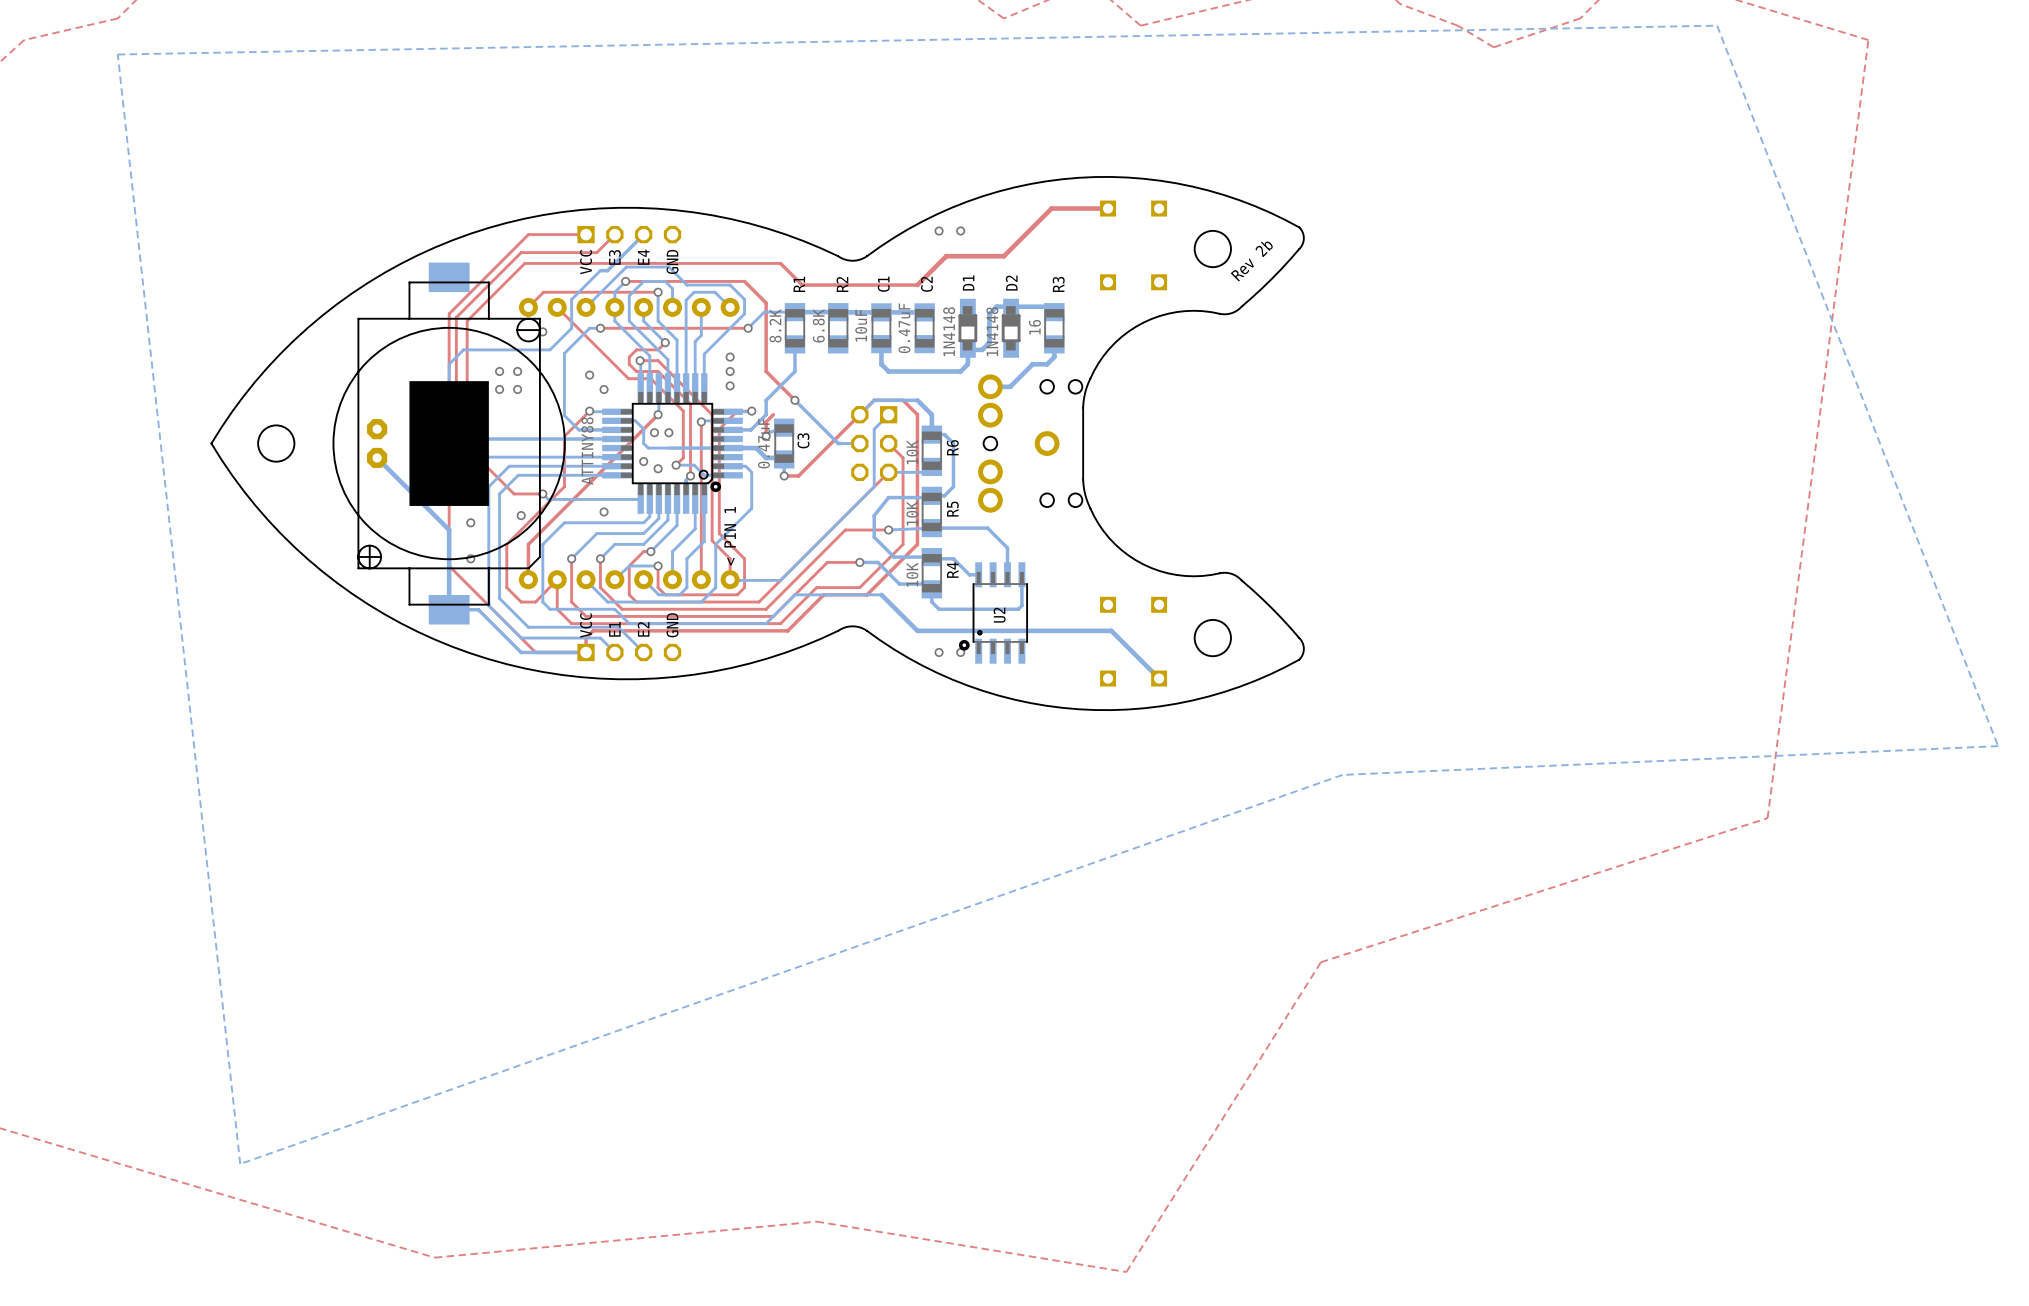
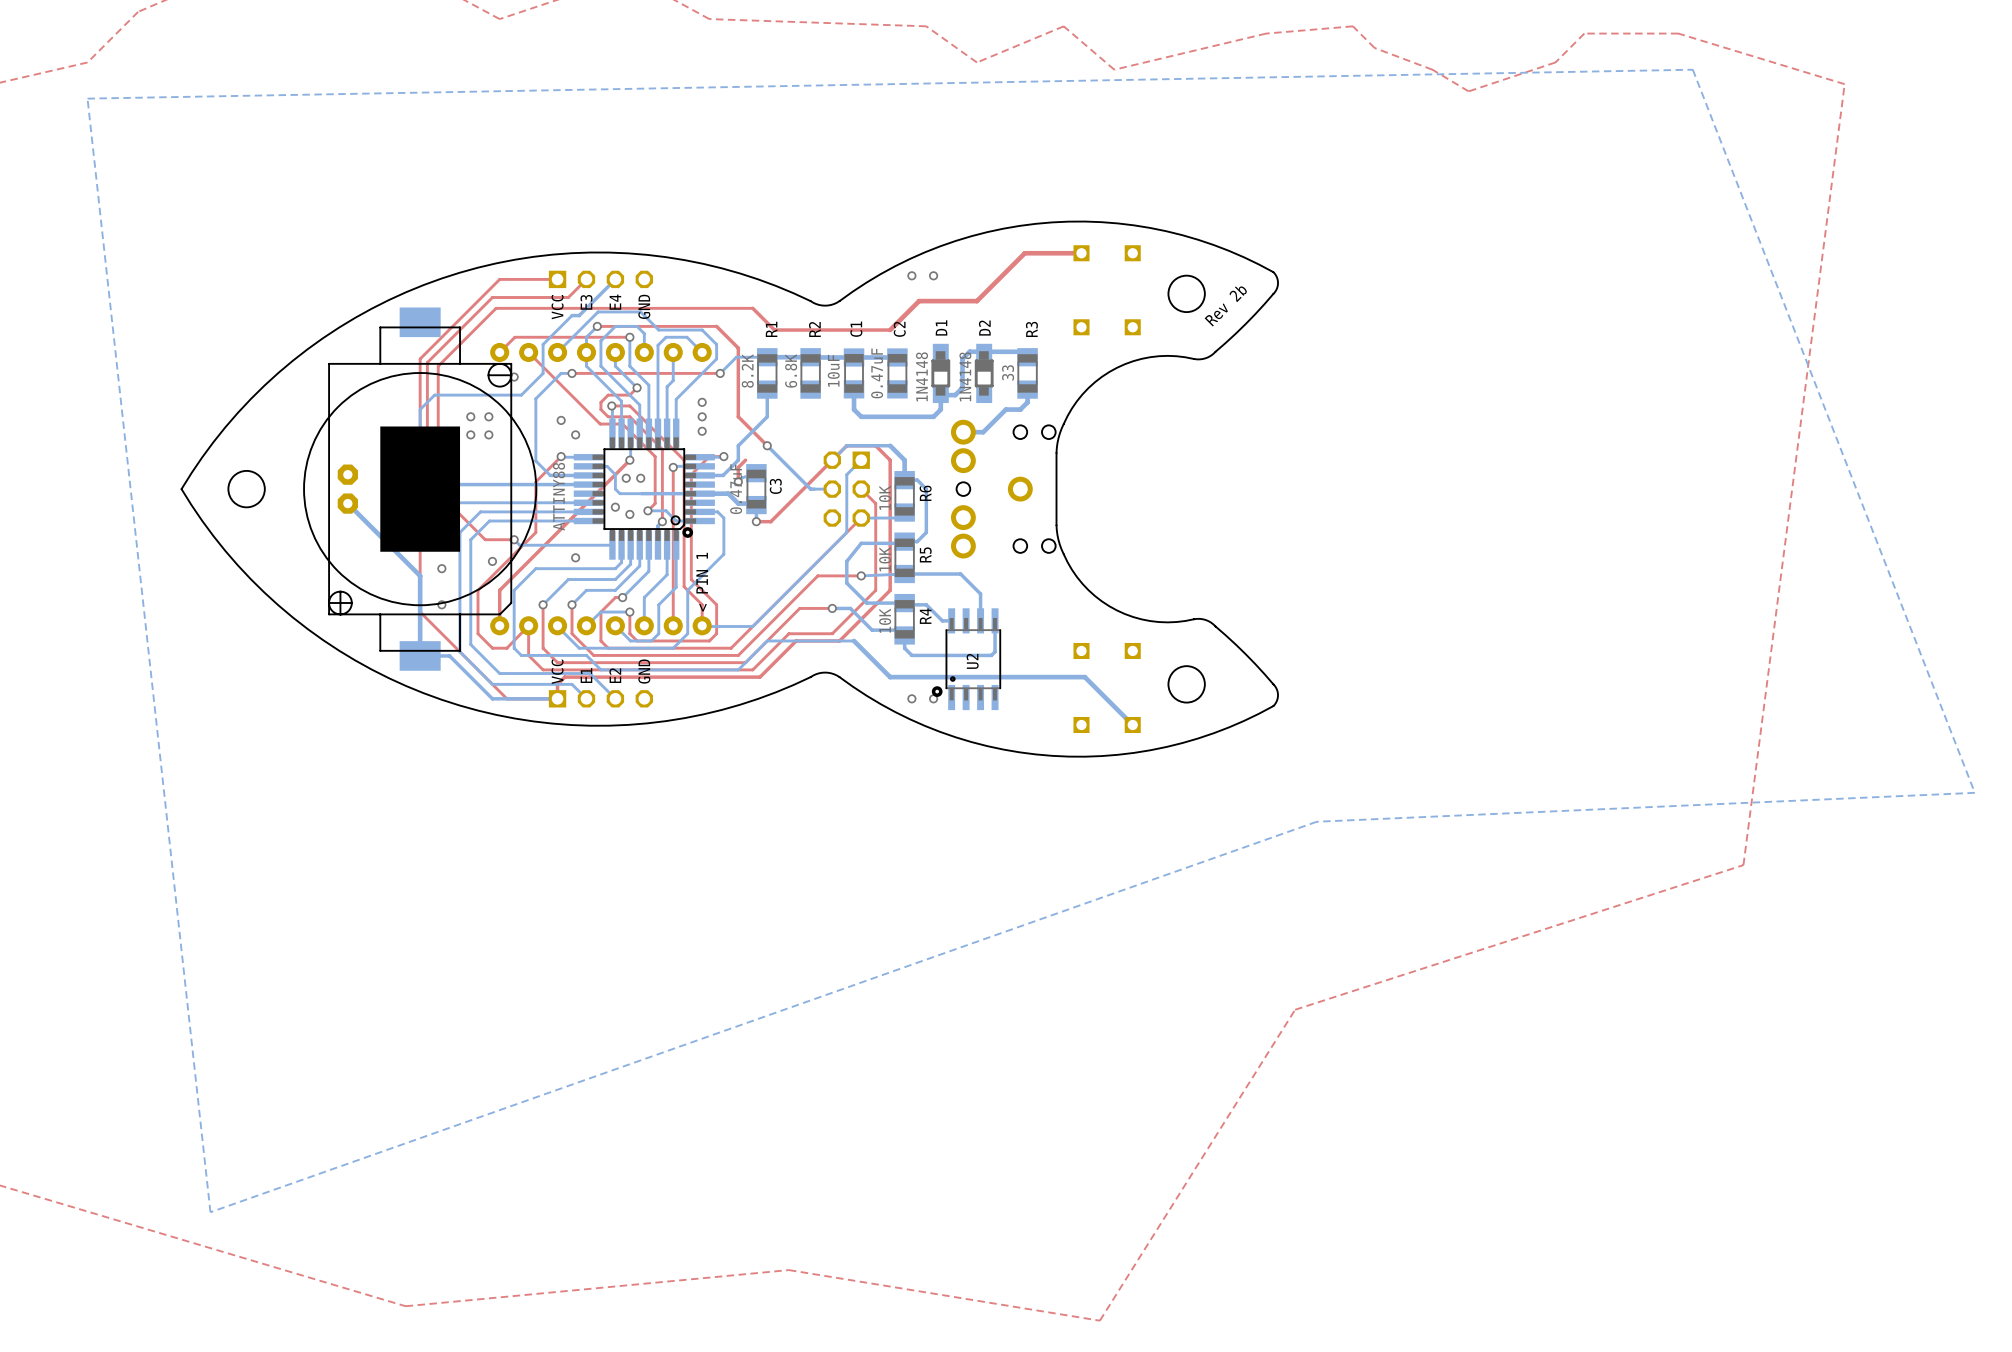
R3 value: 16 (1034, 327) -> 33 (1008, 372)

